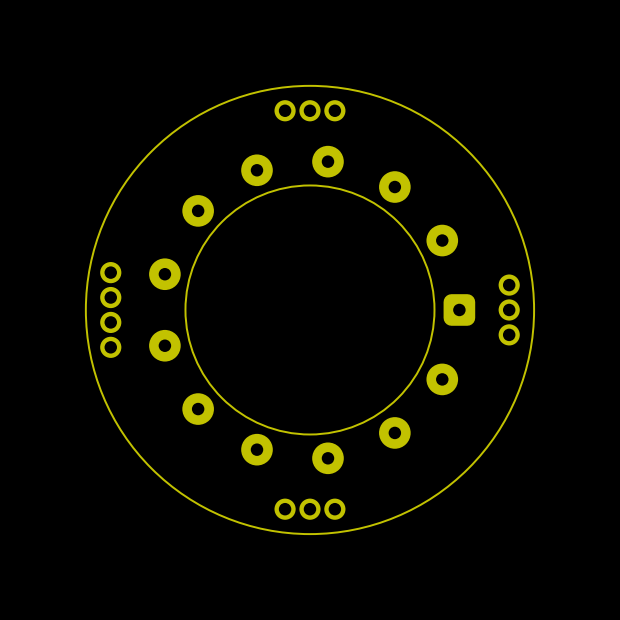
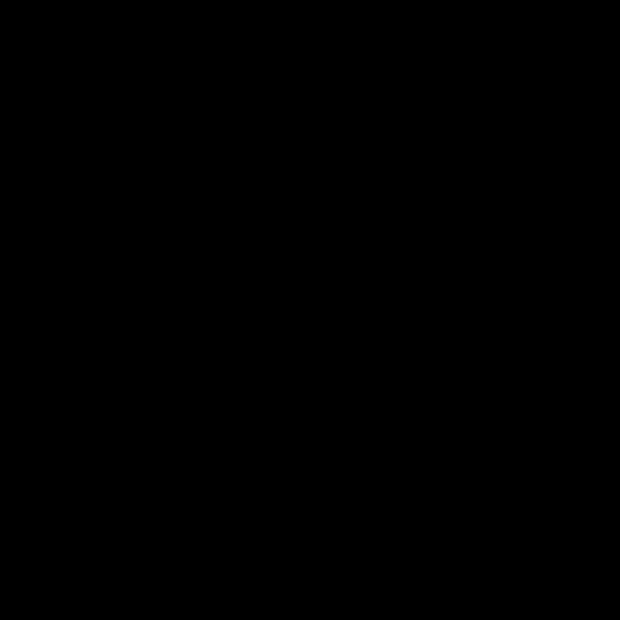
round board edge: [85, 85, 535, 535] -> none
part: (285, 110) -> none
part: (309, 110) -> none
part: (334, 110) -> none
part: (327, 161) -> none
part: (256, 170) -> none
round board edge: [184, 184, 436, 436] -> none
part: (394, 187) -> none
part: (198, 210) -> none
part: (442, 240) -> none
part: (110, 272) -> none
part: (164, 274) -> none
part: (509, 285) -> none
part: (110, 297) -> none
part: (459, 309) -> none
part: (509, 309) -> none
part: (110, 322) -> none
part: (509, 334) -> none
part: (164, 345) -> none
part: (110, 347) -> none
part: (442, 379) -> none
part: (198, 409) -> none
part: (394, 432) -> none
part: (256, 449) -> none
part: (327, 458) -> none
part: (285, 509) -> none
part: (309, 509) -> none
part: (334, 509) -> none

